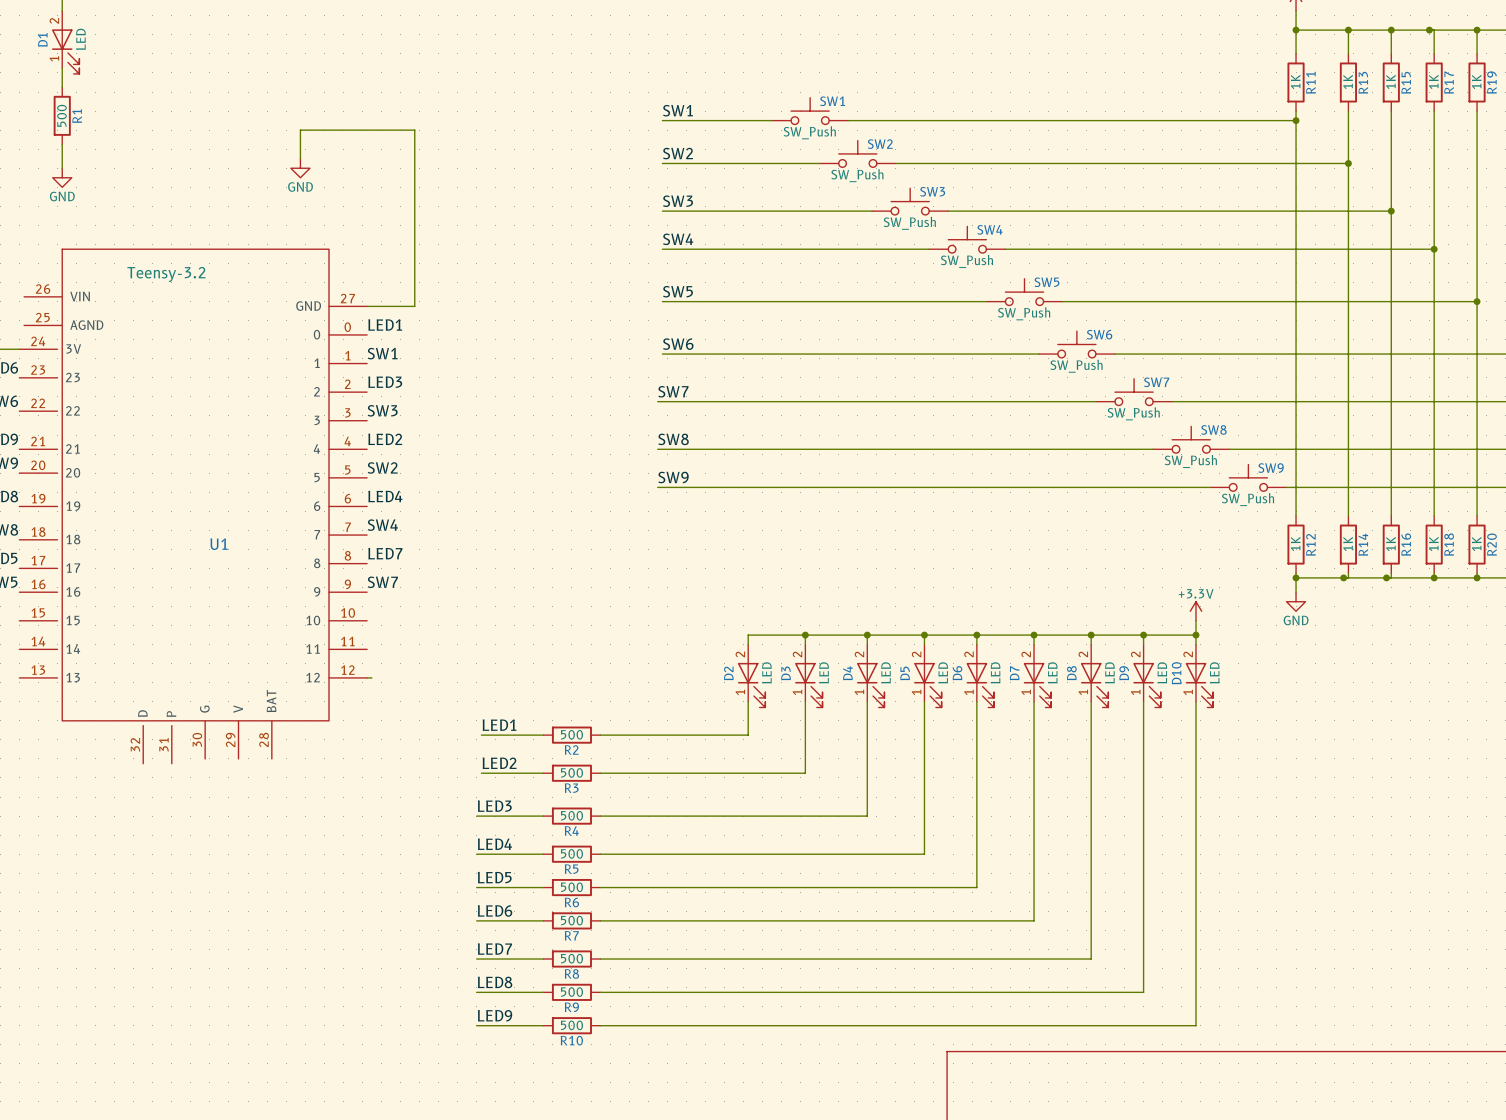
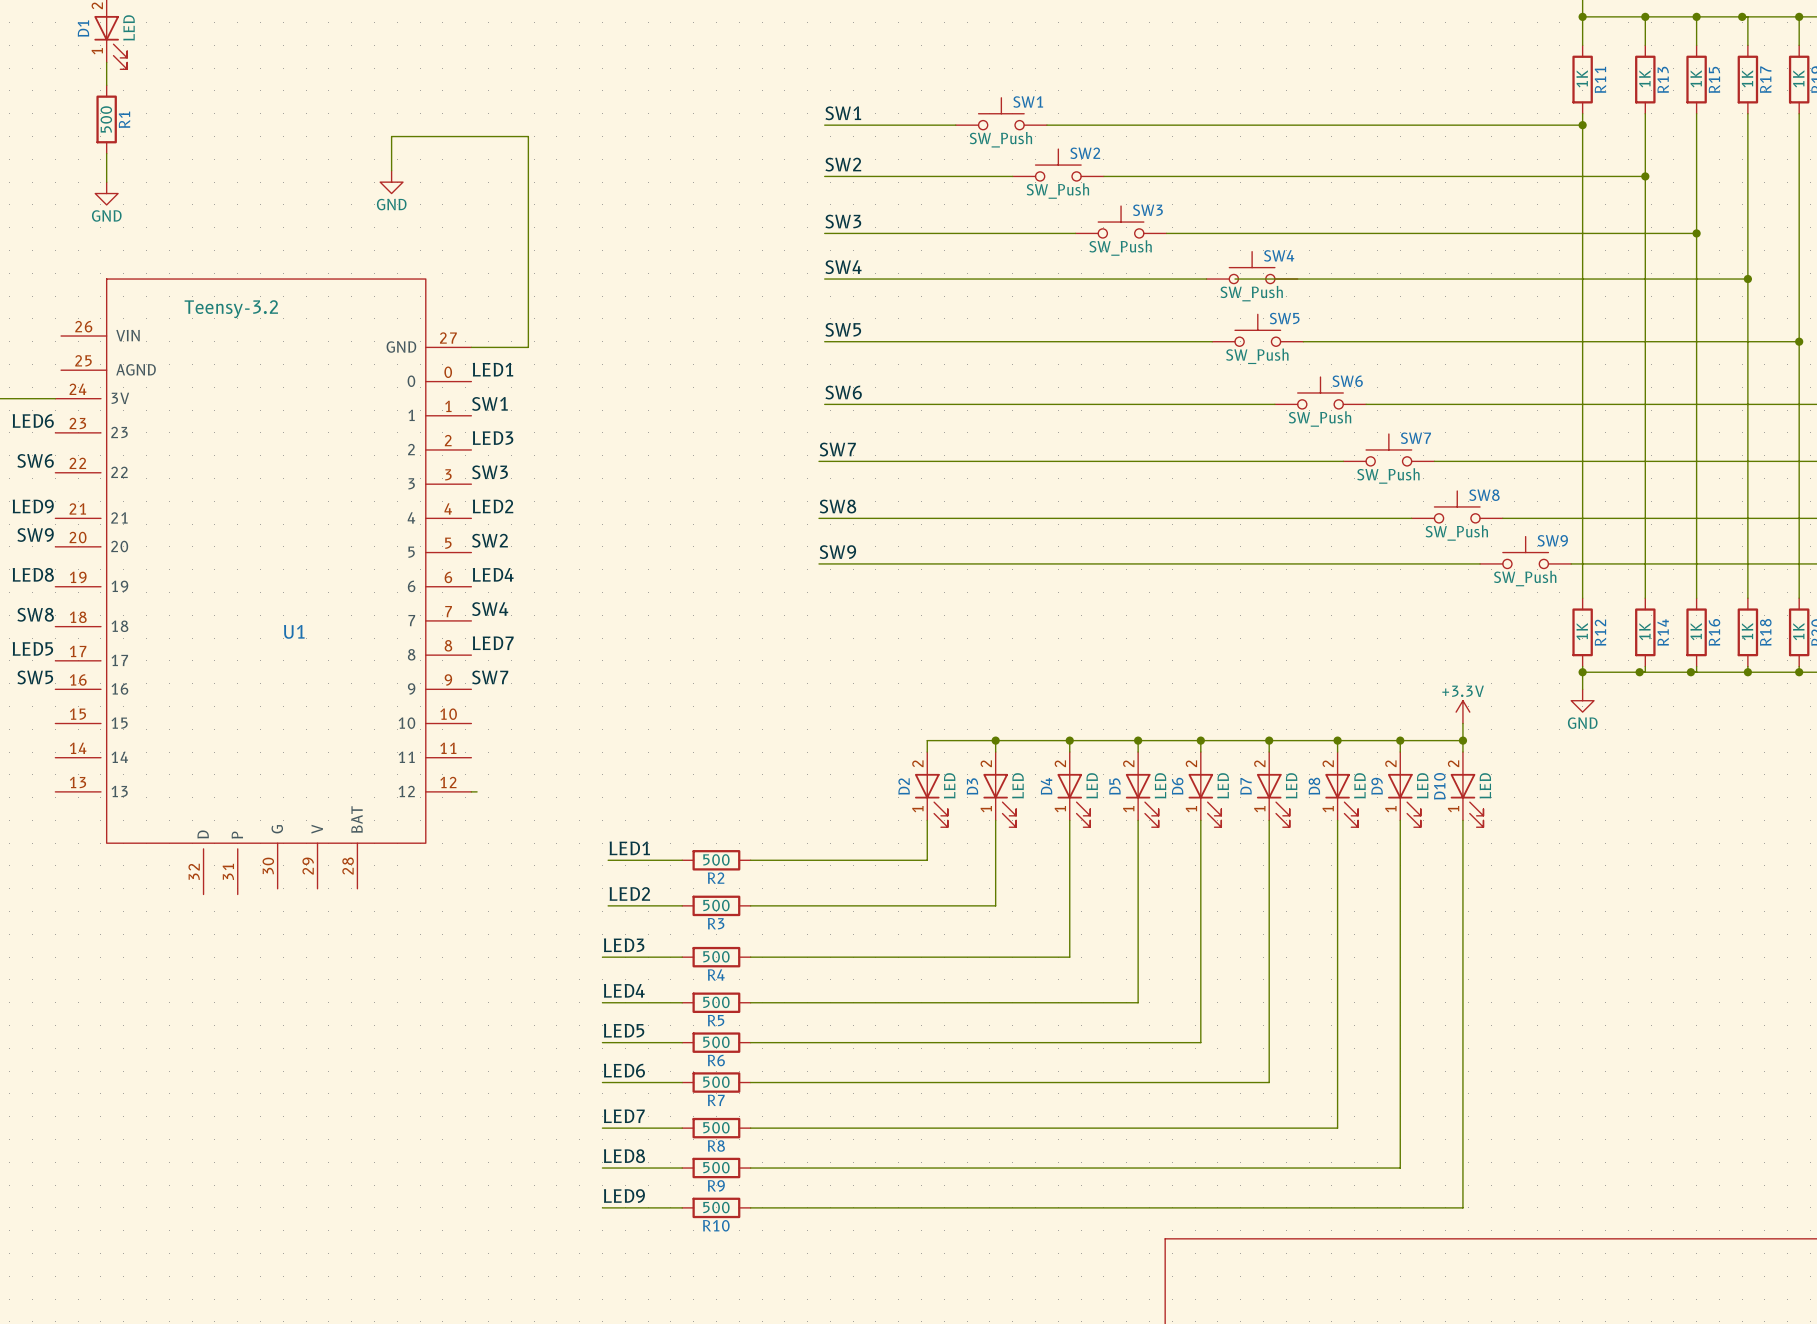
SW4 position: (967, 239) -> (1252, 267)
wire: none -> (1143, 279) (1206, 279)

